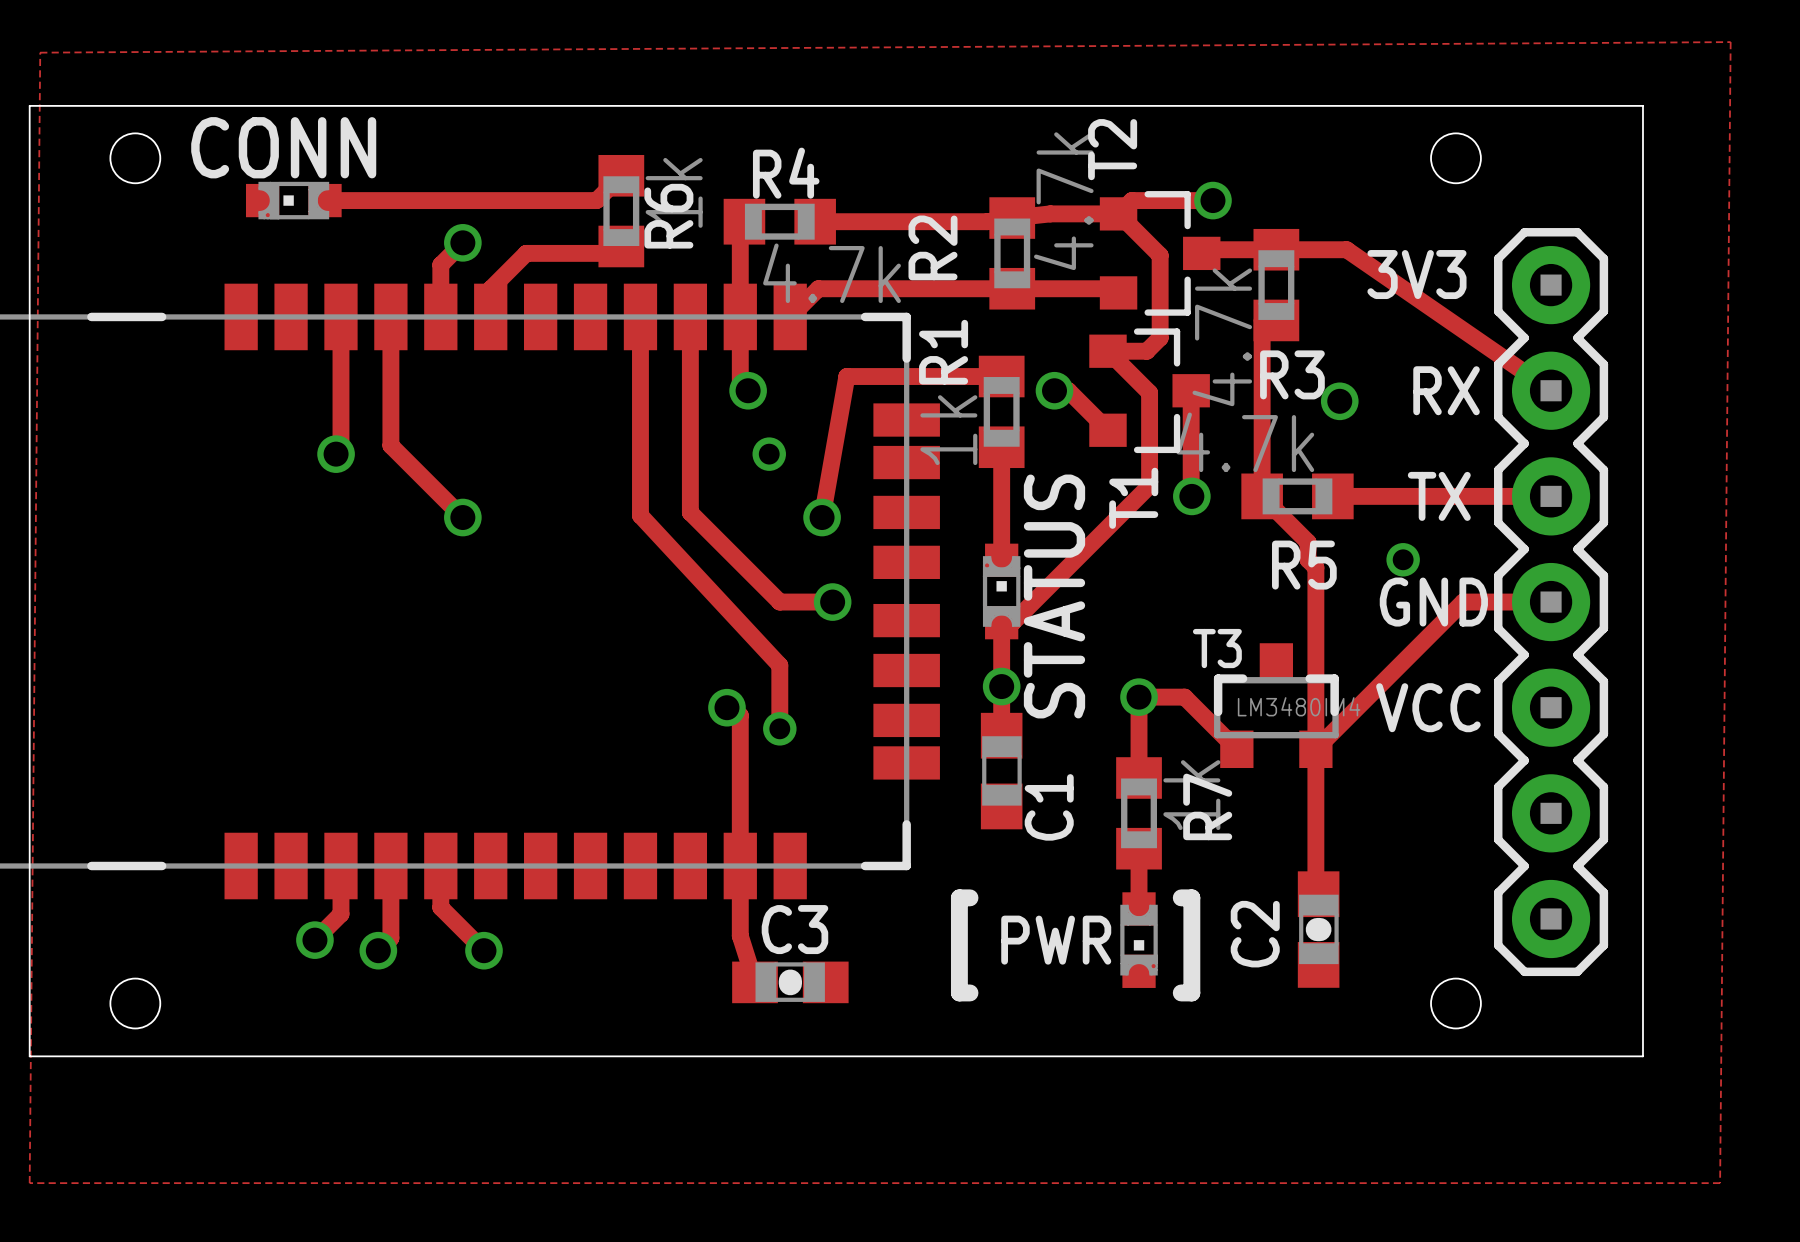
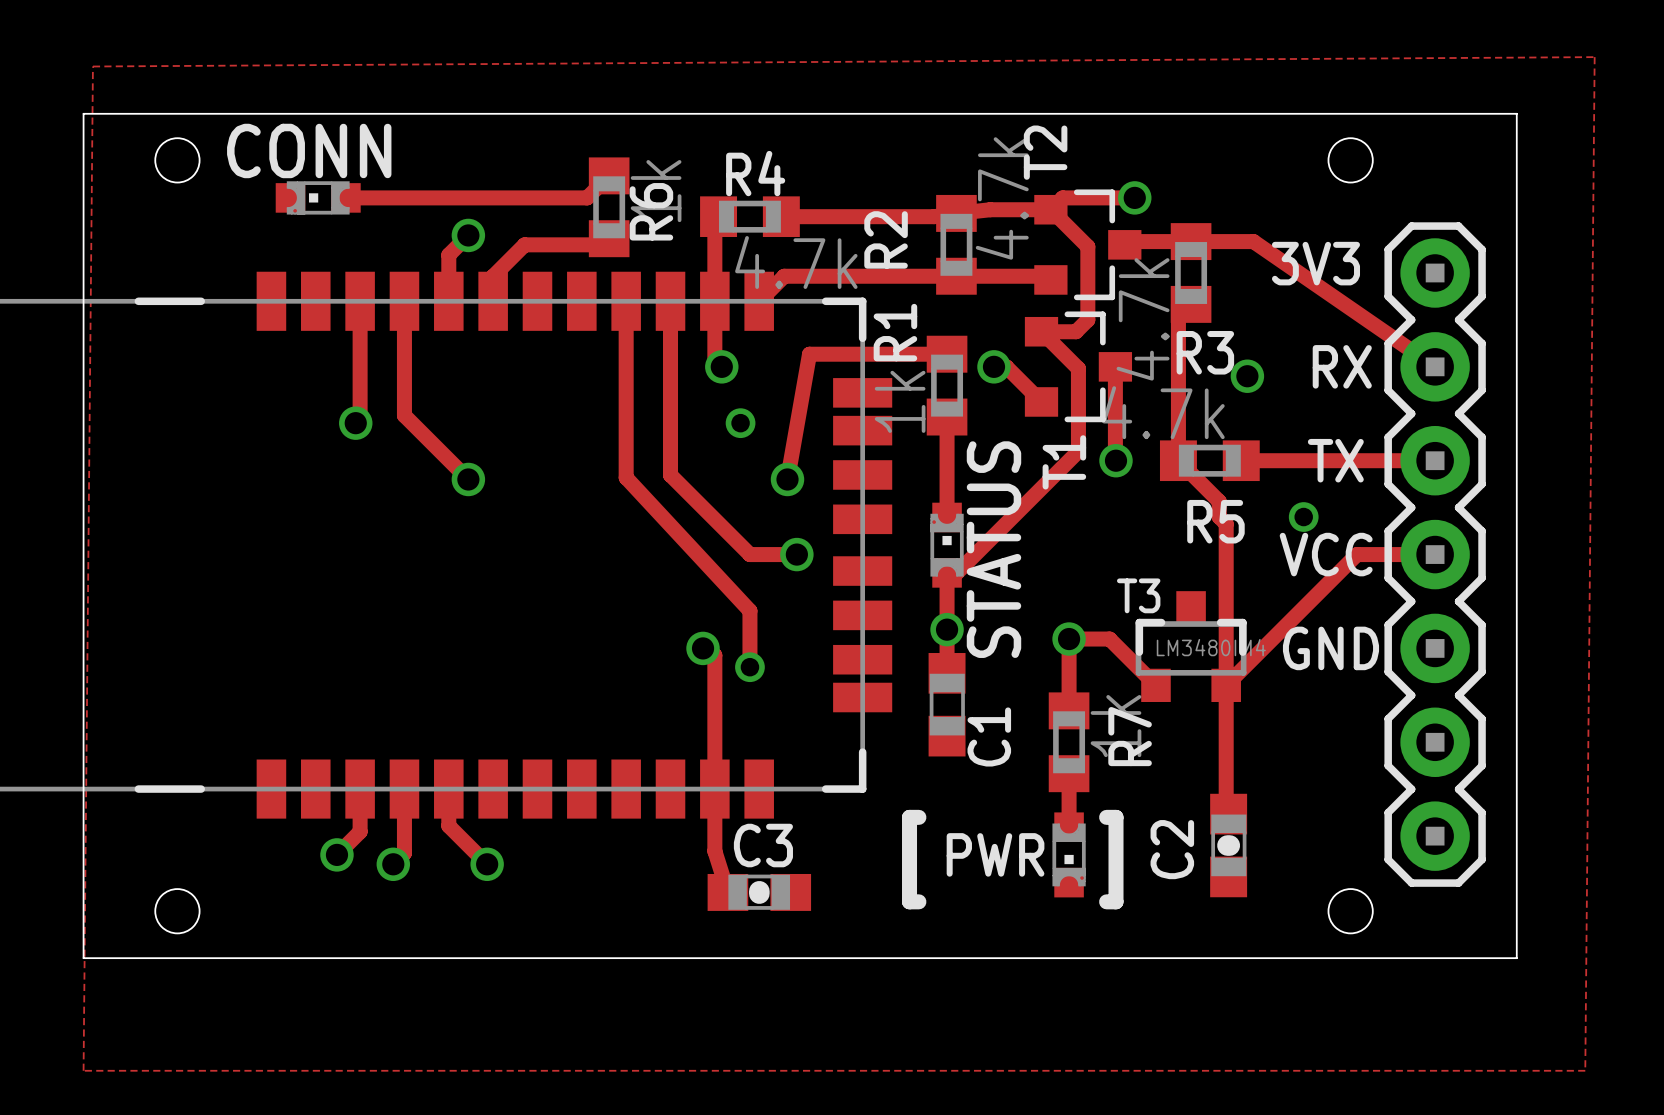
text: GND (1433, 602) -> VCC (1326, 554)
text: VCC (1428, 707) -> GND (1330, 648)

